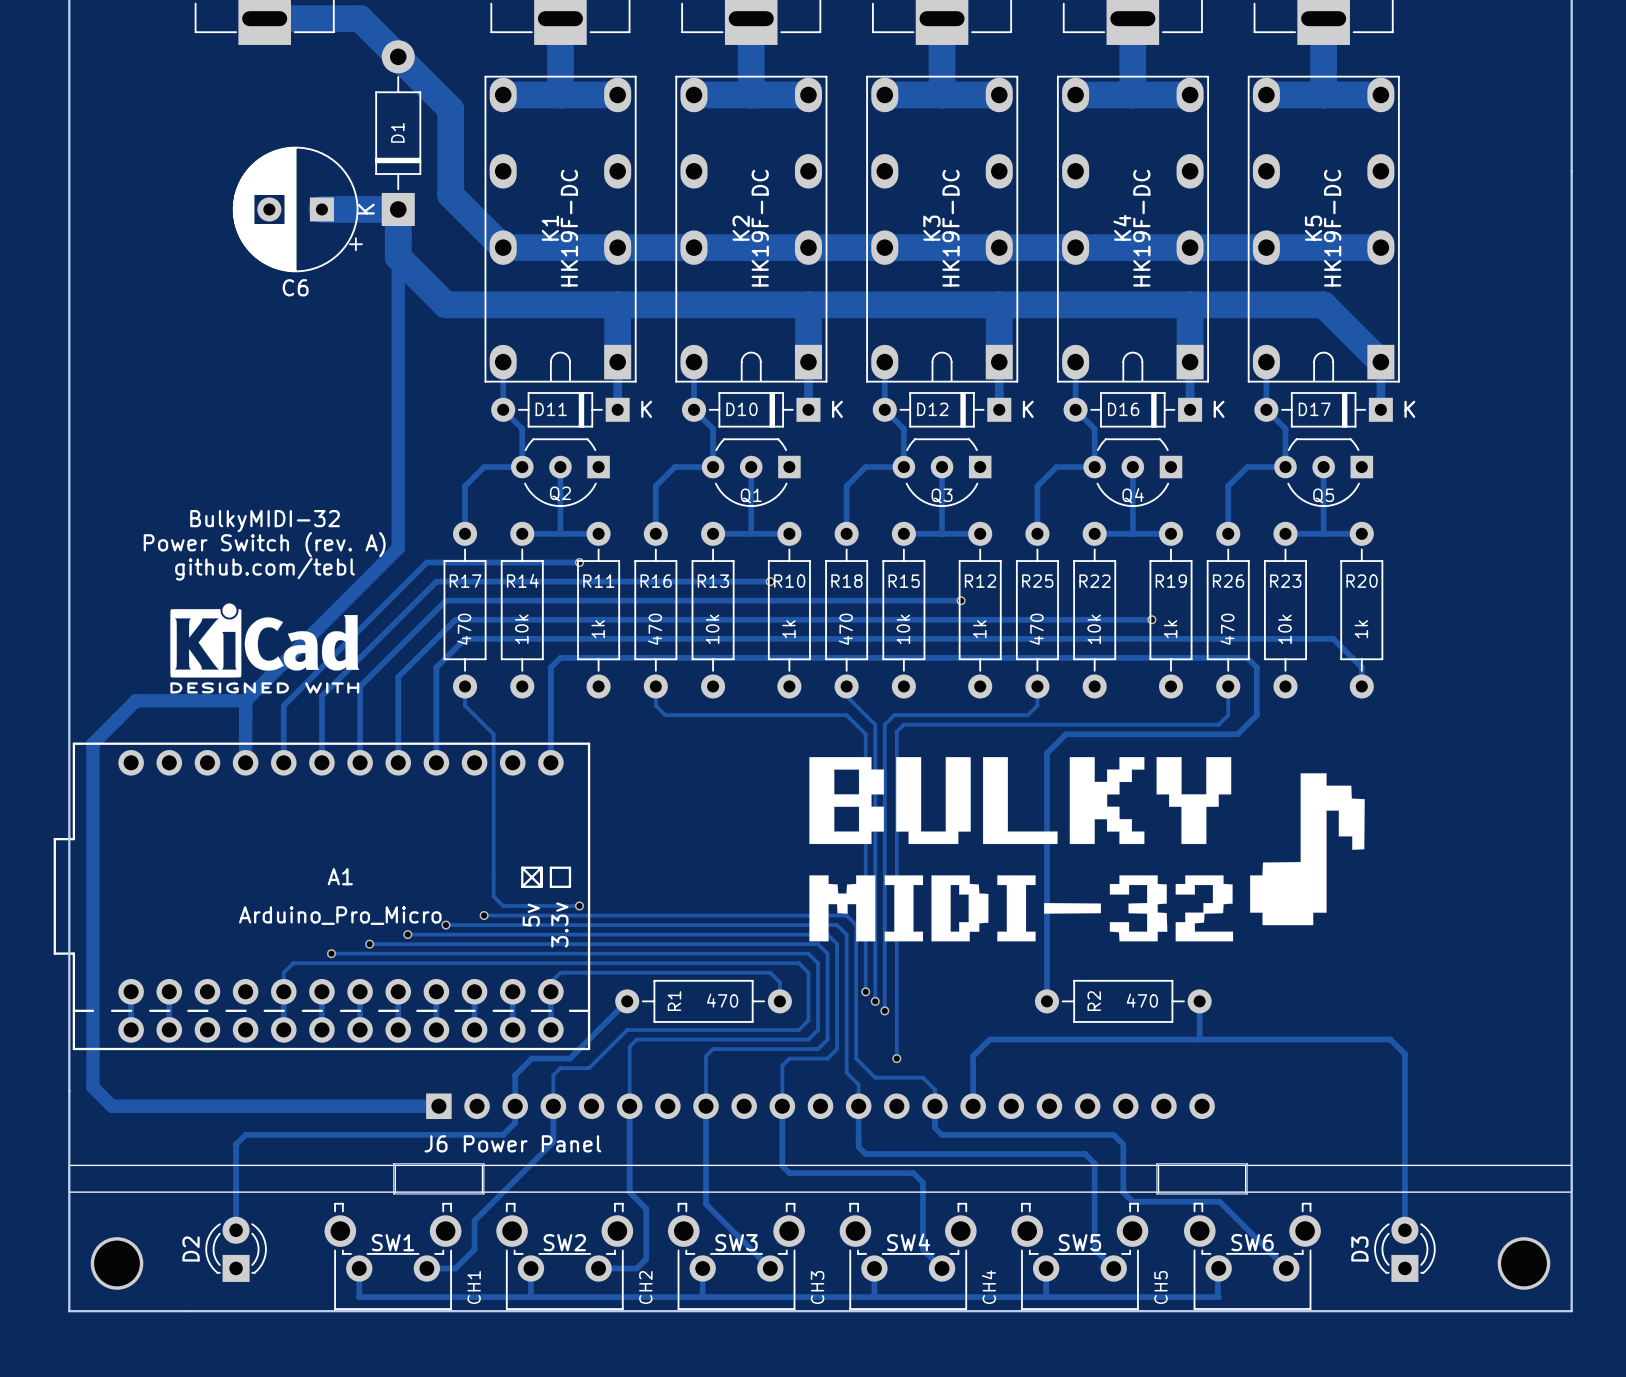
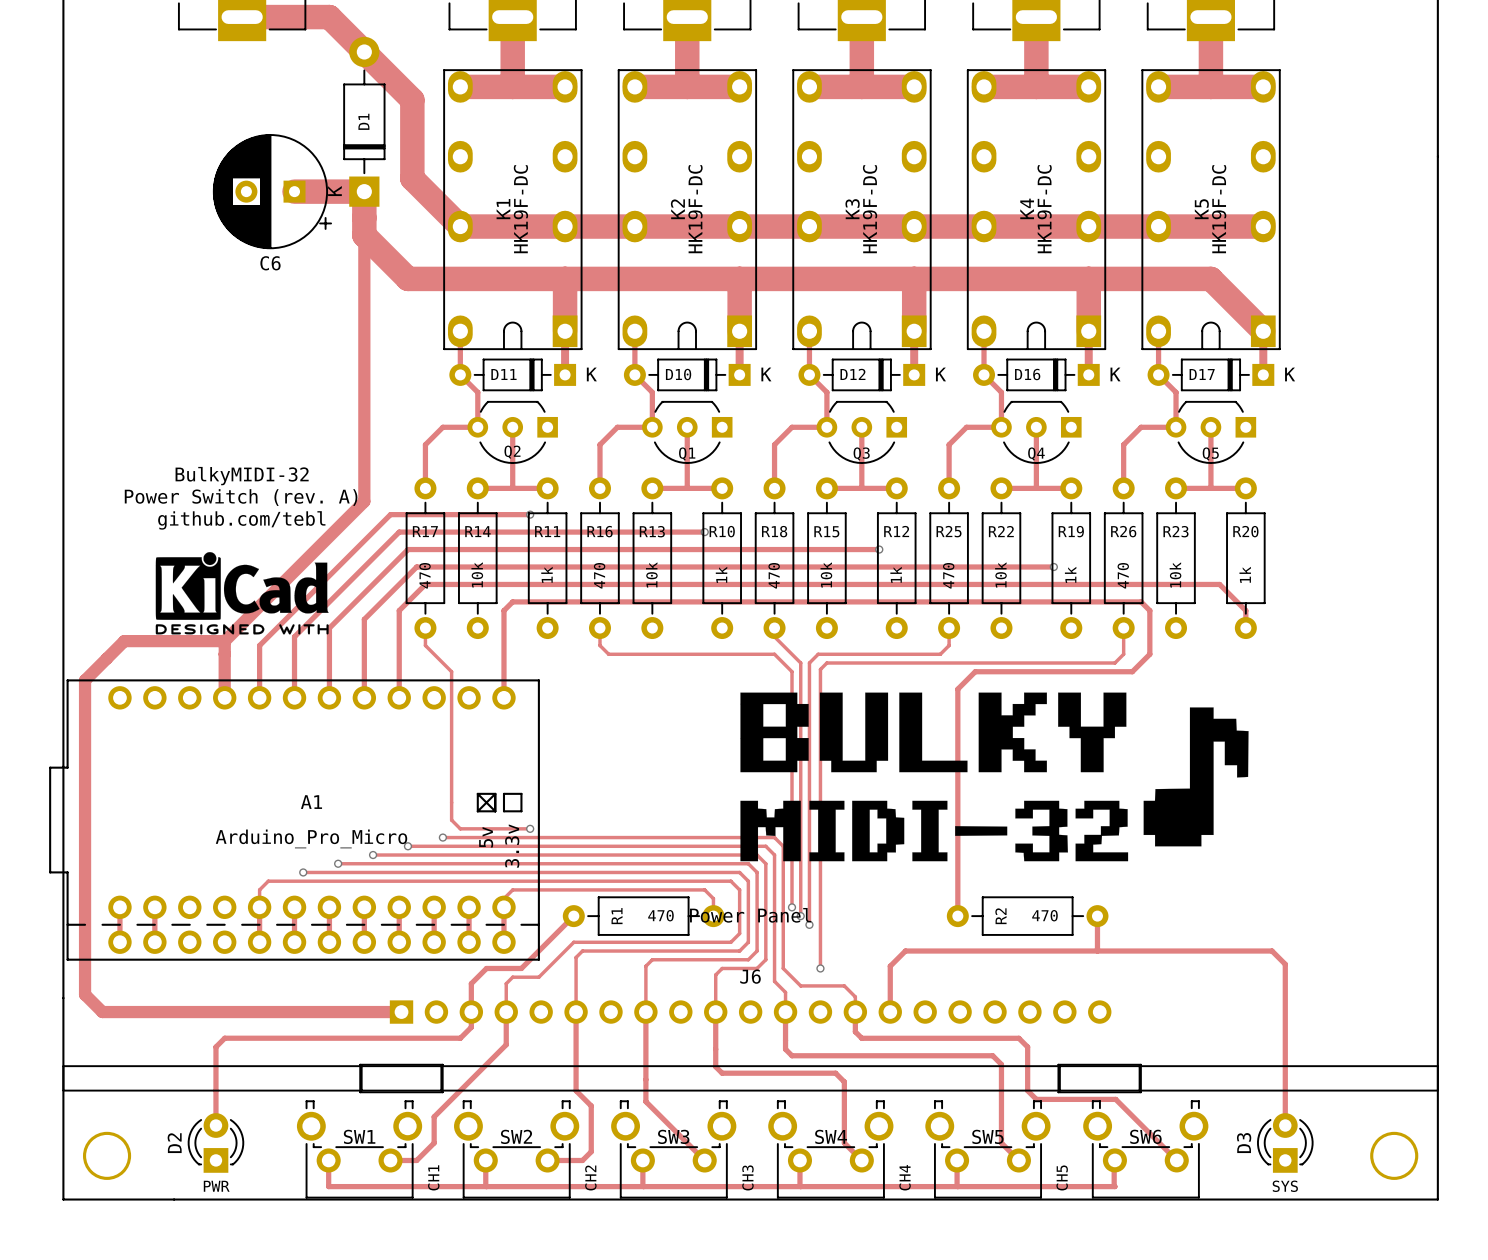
J6 name position: J6 (436, 1143) -> J6 (750, 976)
J6 value position: Power Panel (532, 1143) -> Power Panel (750, 915)
D2 value: none -> PWR (216, 1186)
D3 value: none -> SYS (1285, 1186)

